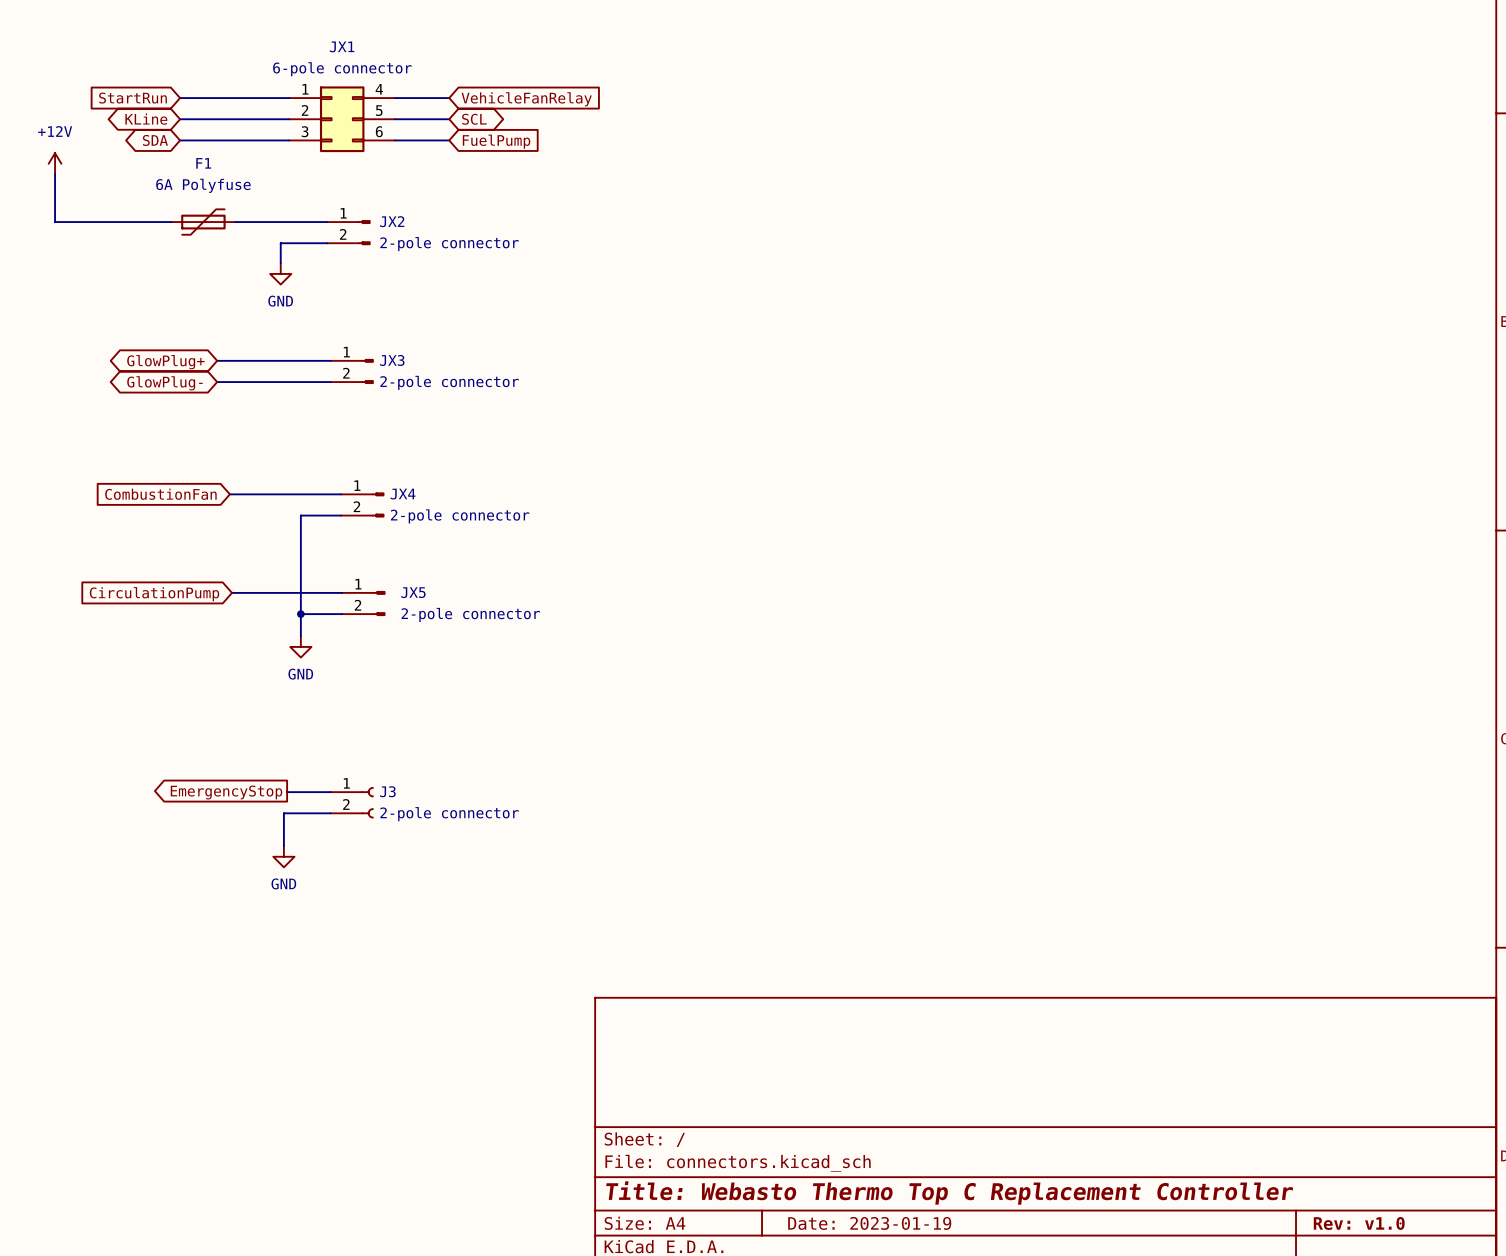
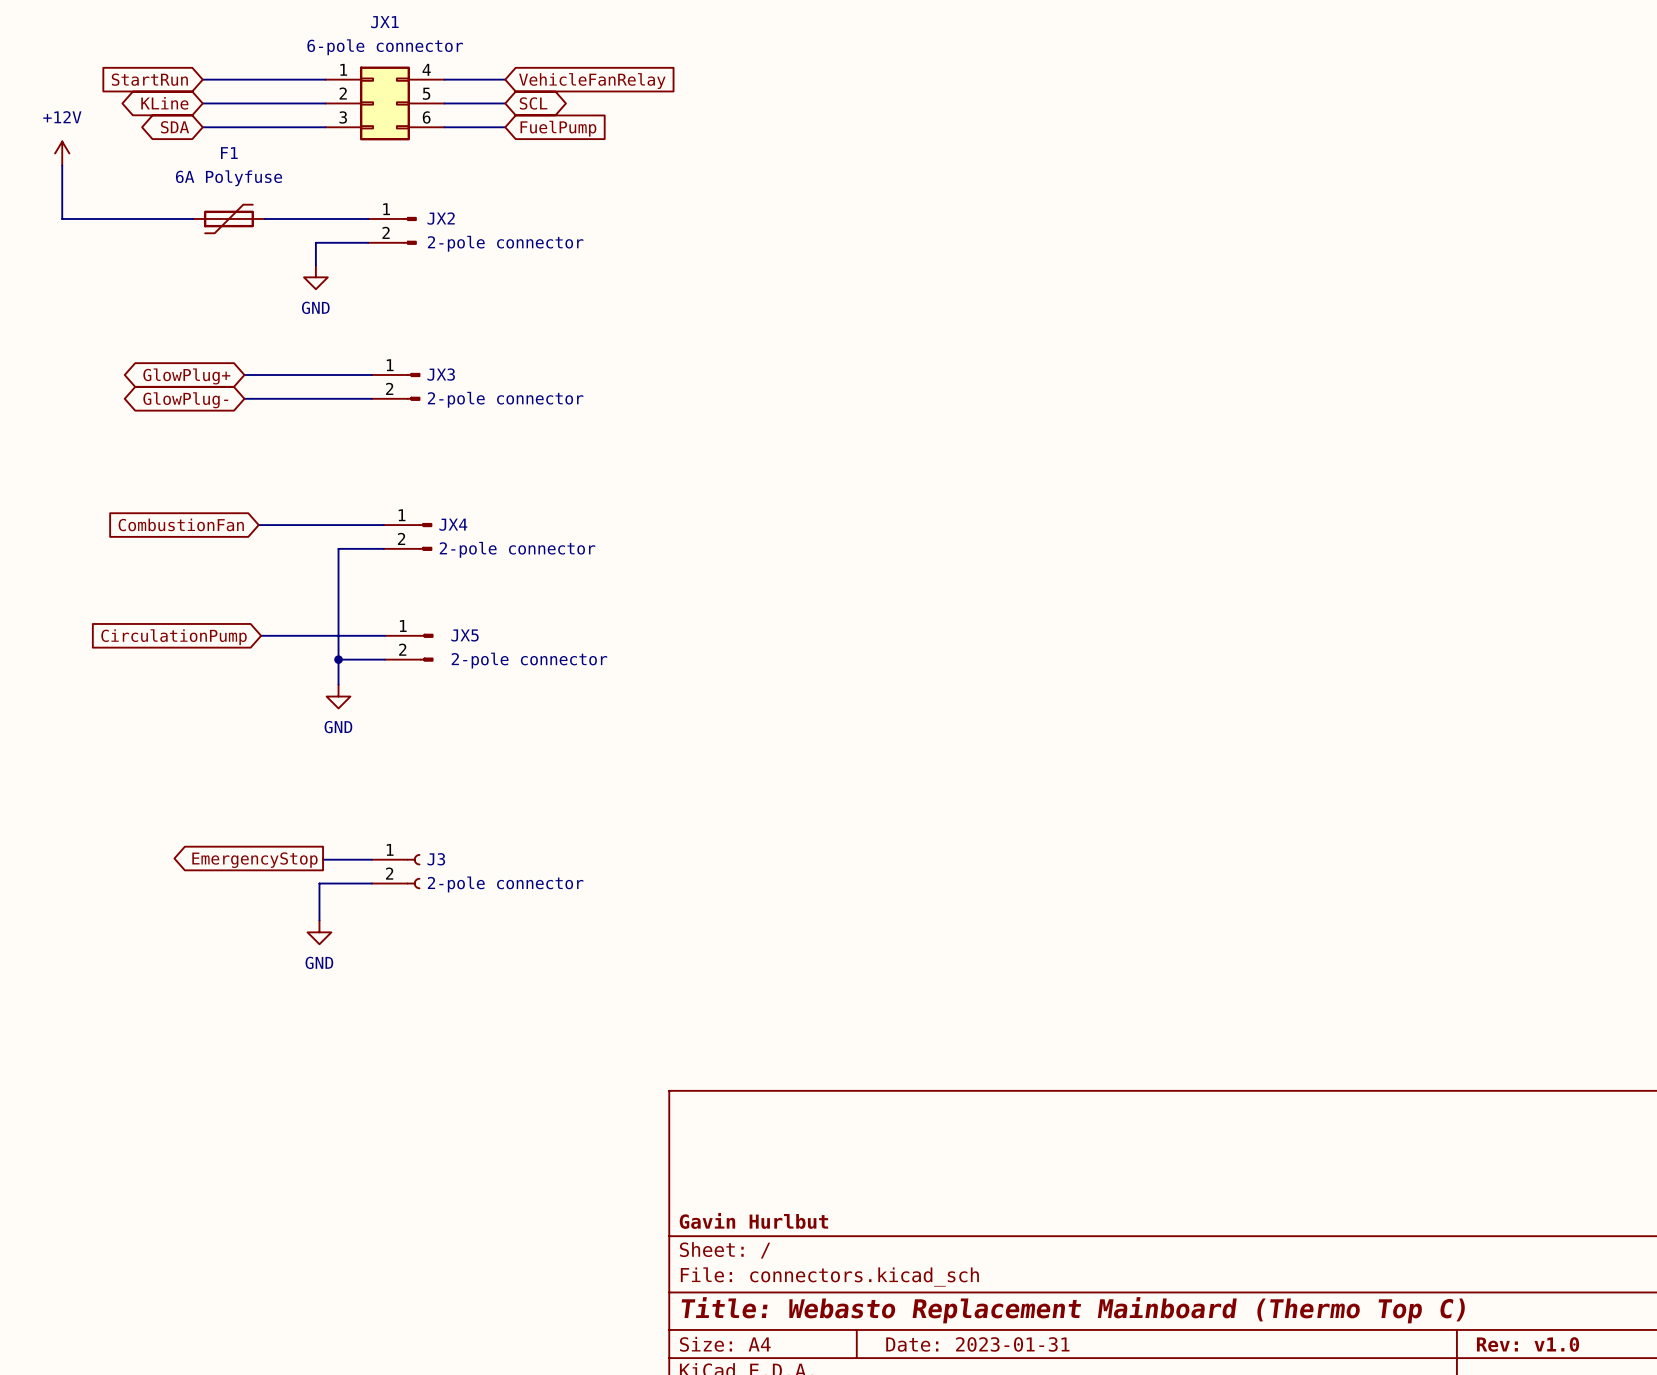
title block: none -> Gavin Hurlbut (753, 1220)
title block: Title: Webasto Thermo Top C Replacement Controller (949, 1192) -> Title: Webasto Replacement Mainboard (Thermo Top C) (1073, 1310)
title block: Date: 2023-01-19 (869, 1223) -> Date: 2023-01-31 (977, 1344)

